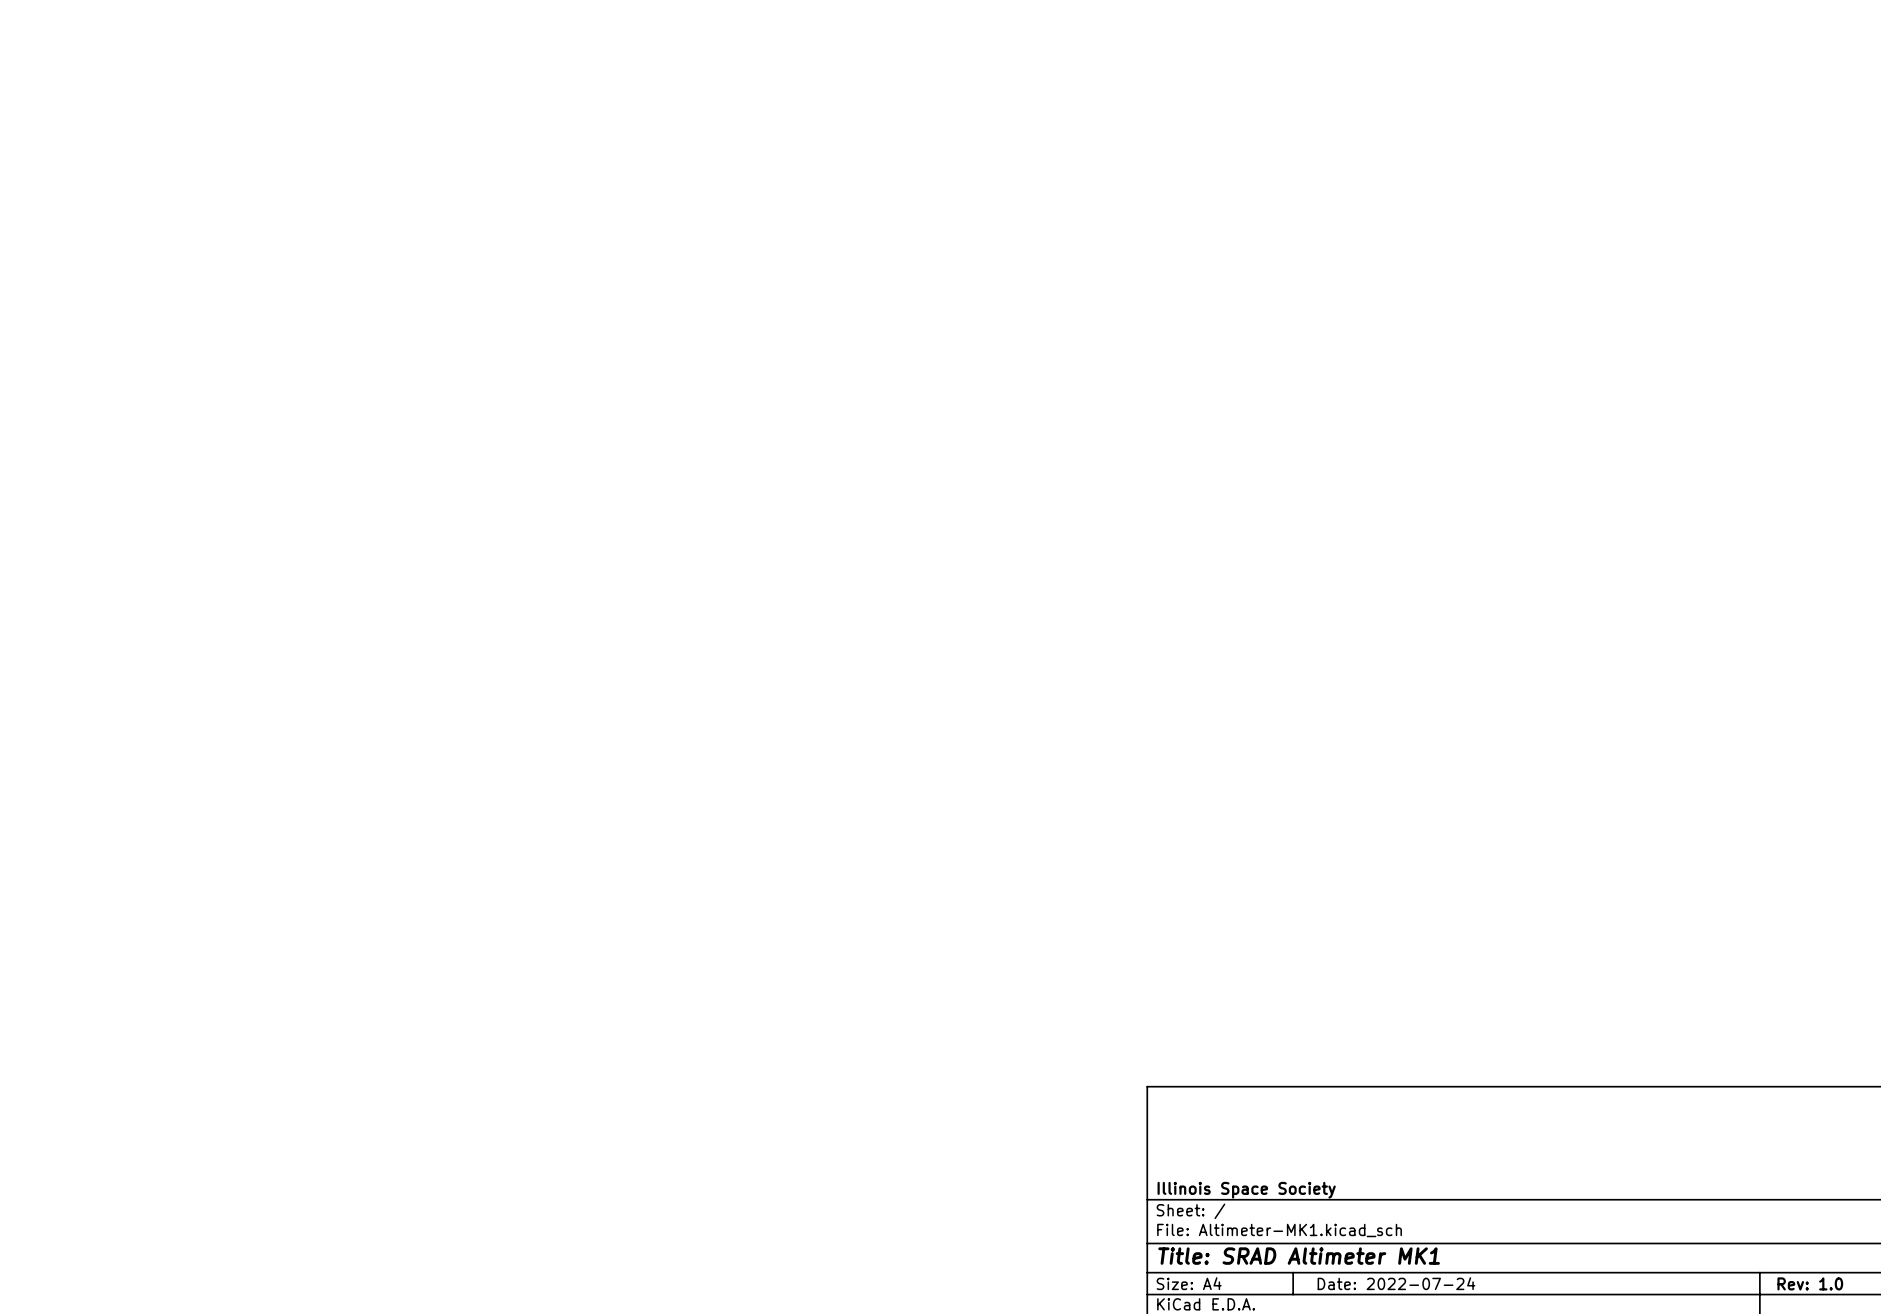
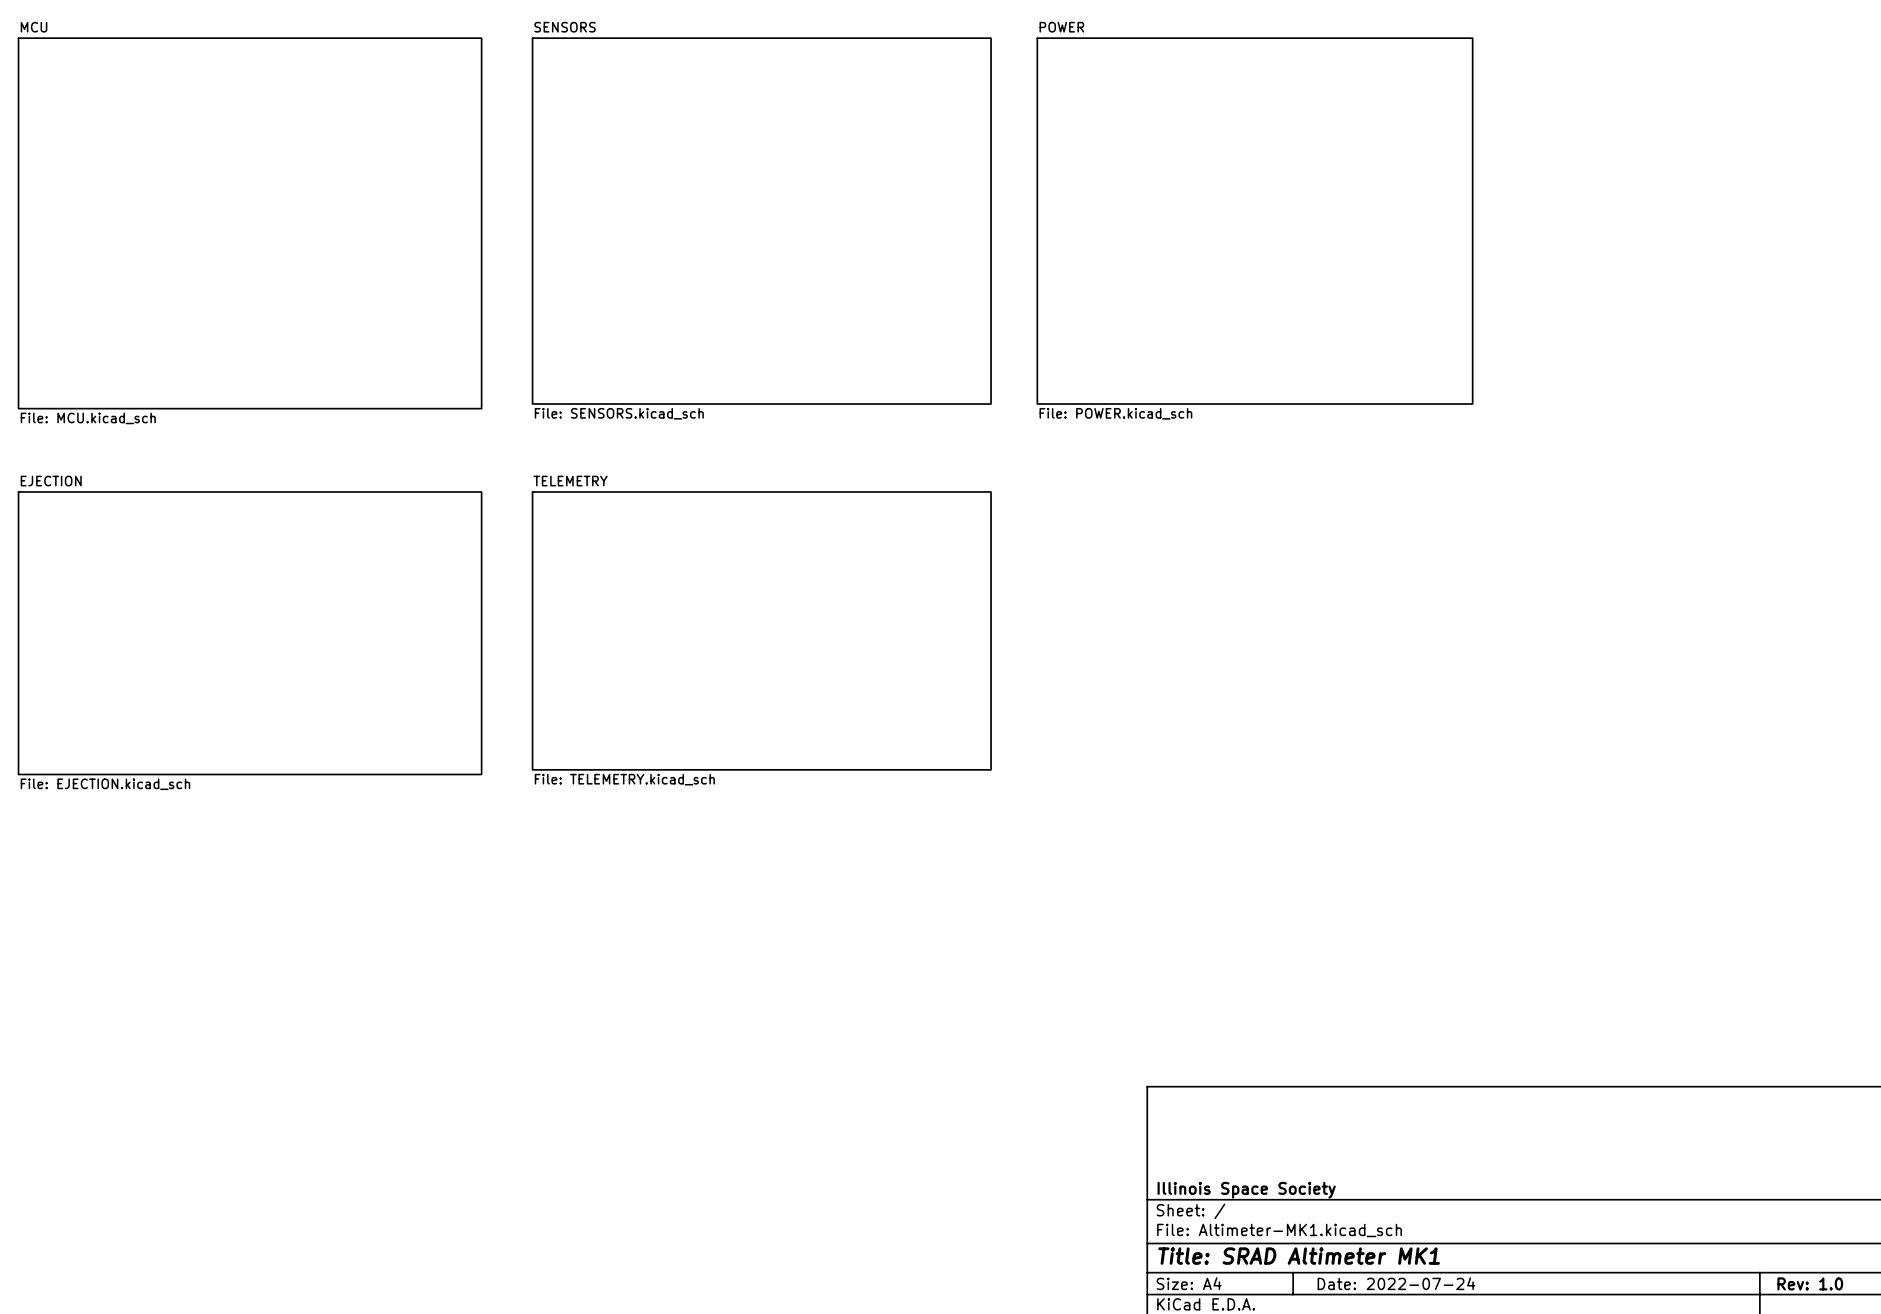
sheet SENSORS: none -> File: SENSORS.kicad_sch (761, 221)
sheet POWER: none -> File: POWER.kicad_sch (1254, 221)
sheet MCU: none -> File: MCU.kicad_sch (250, 223)
sheet TELEMETRY: none -> File: TELEMETRY.kicad_sch (761, 630)
sheet EJECTION: none -> File: EJECTION.kicad_sch (250, 633)

